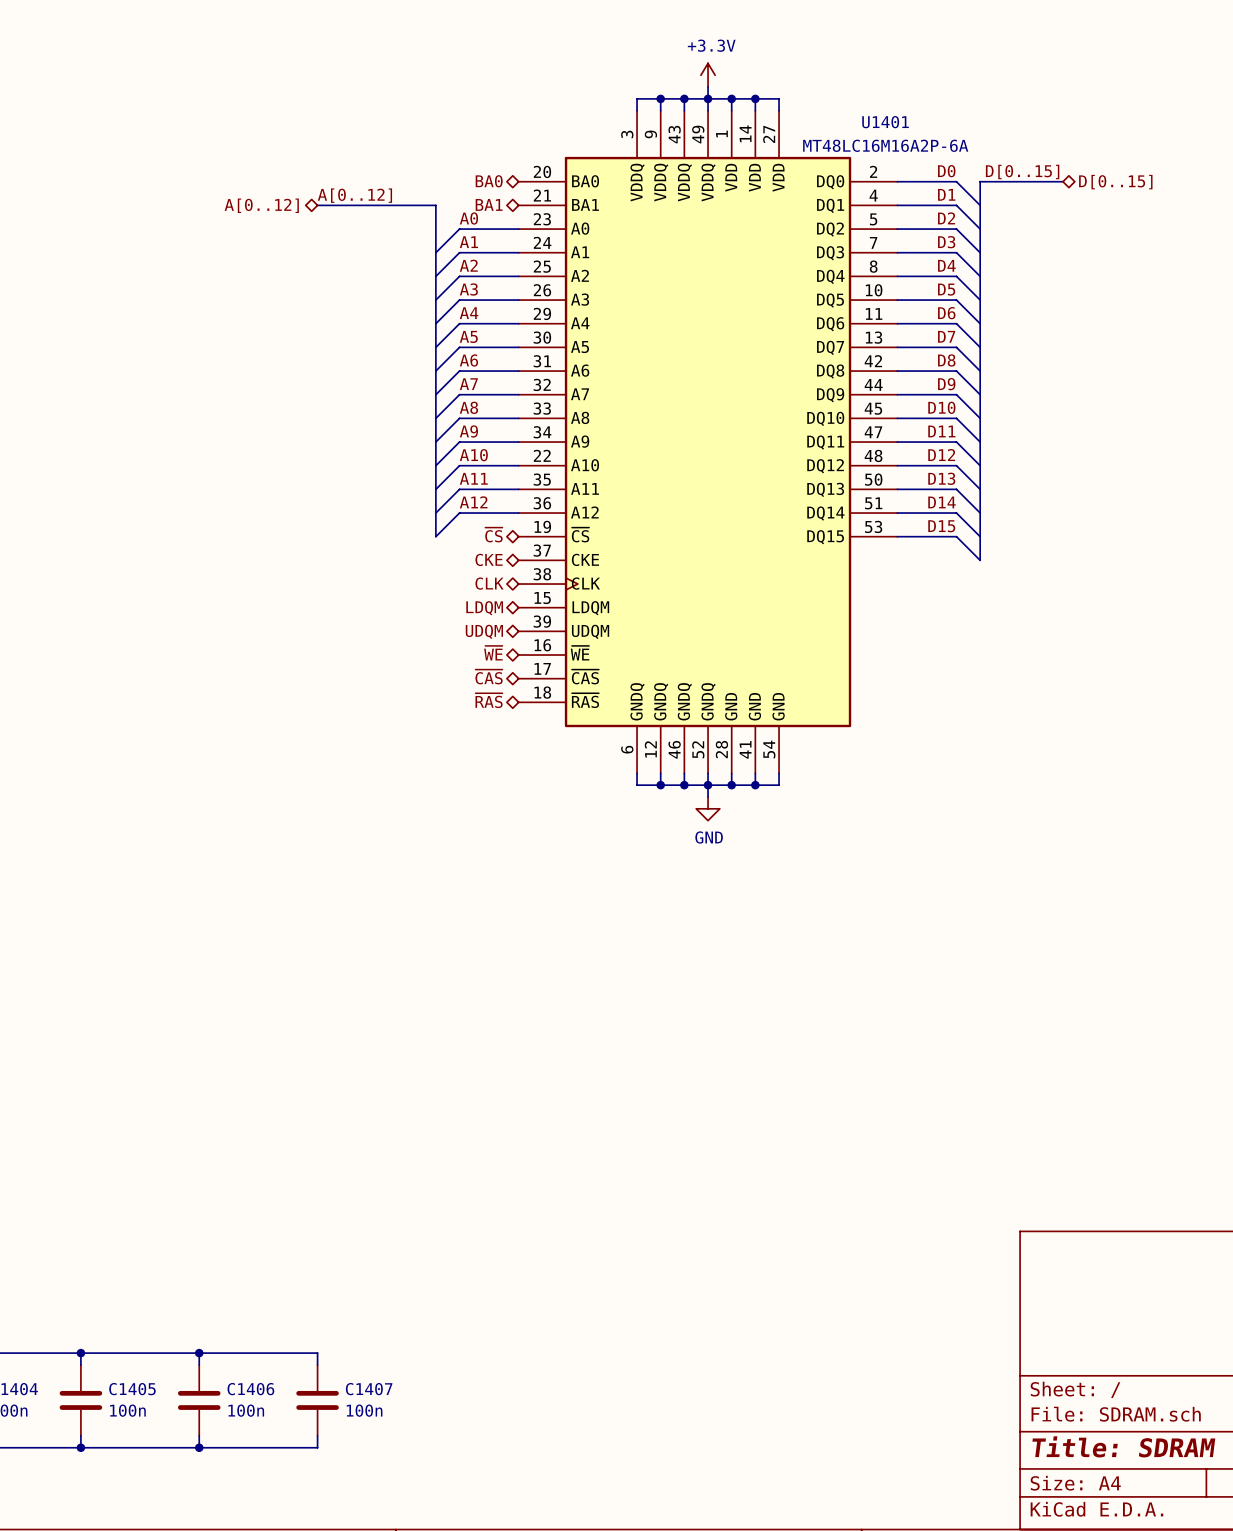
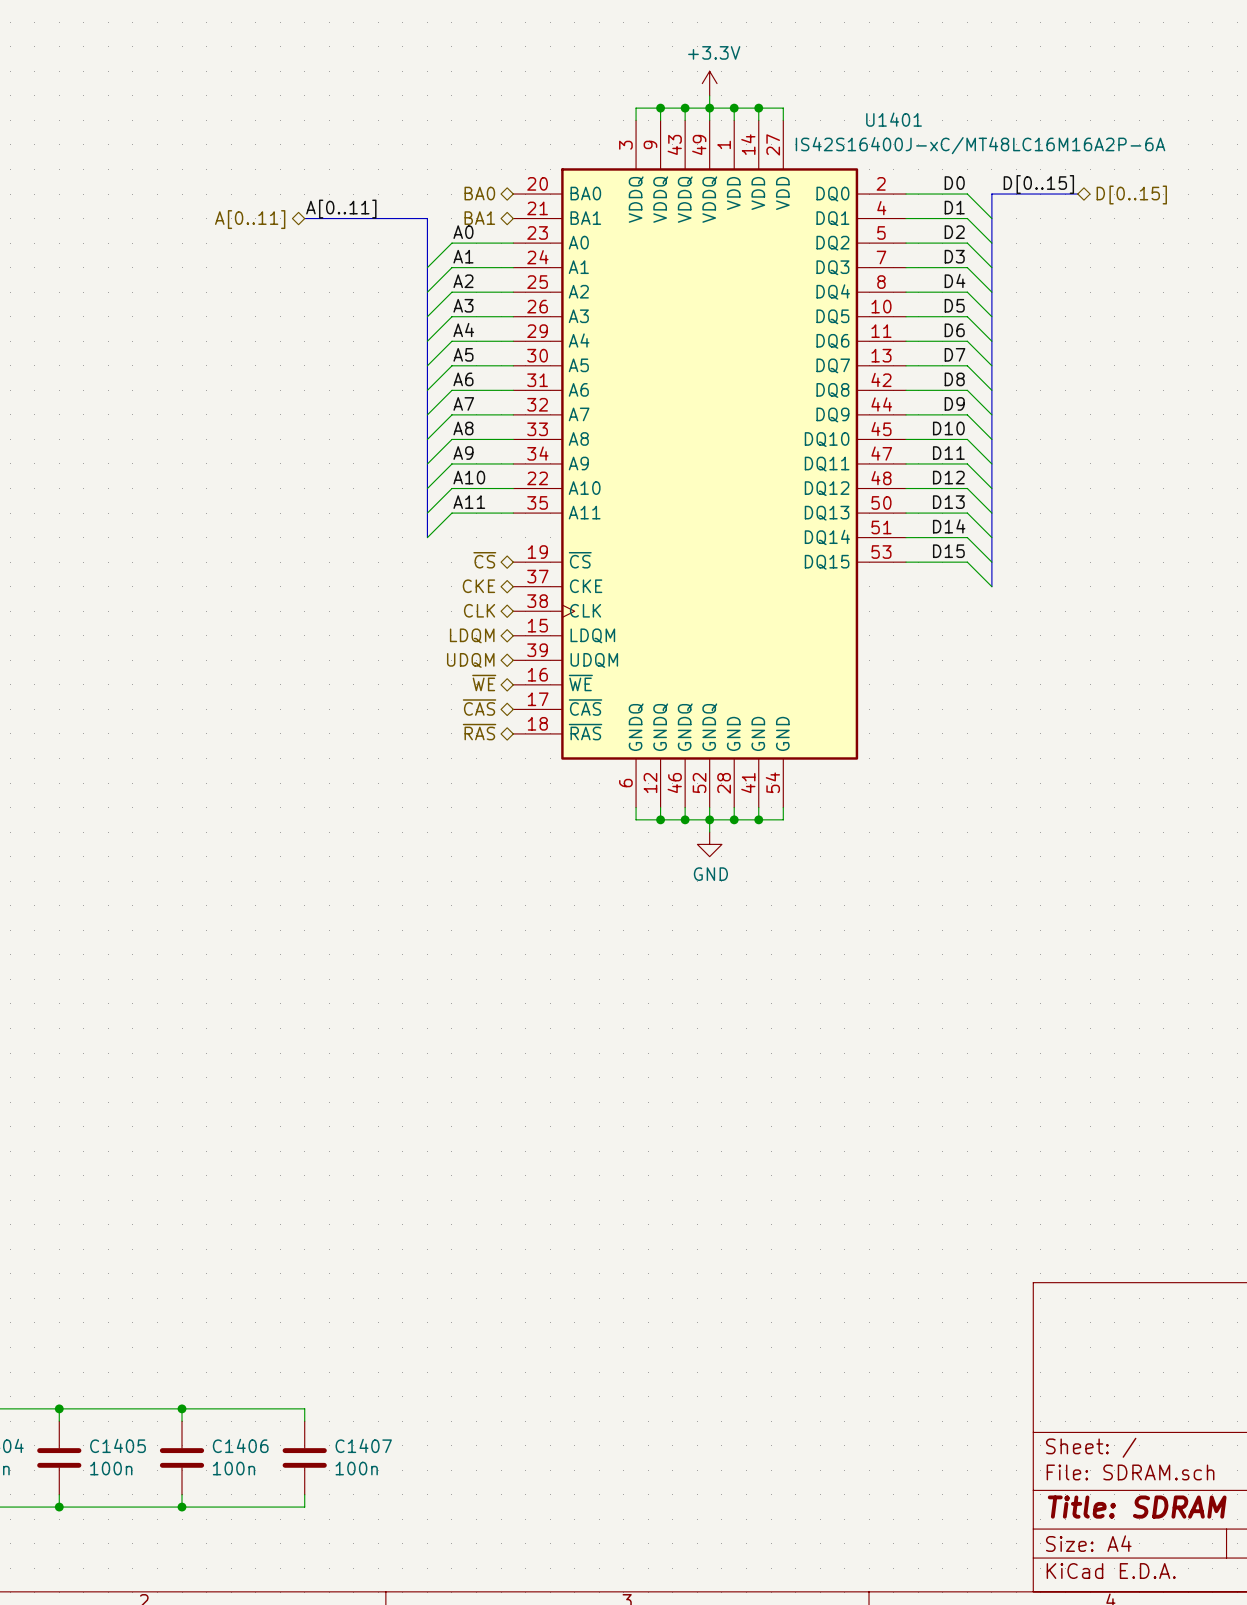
U1401 symbol: [518, 110, 898, 774] -> [513, 120, 907, 808]
U1401 value: MT48LC16M16A2P-6A (885, 145) -> IS42S16400J-xC/MT48LC16M16A2P-6A (980, 145)
label: A[0..12] (354, 195) -> A[0..11] (341, 209)
hierarchical label: A[0..12] (261, 205) -> A[0..11] (250, 219)
label: A12 (473, 502) -> none
bus: (435, 513) (435, 536) -> none
wire: (518, 513) (459, 513) (435, 536) -> none

